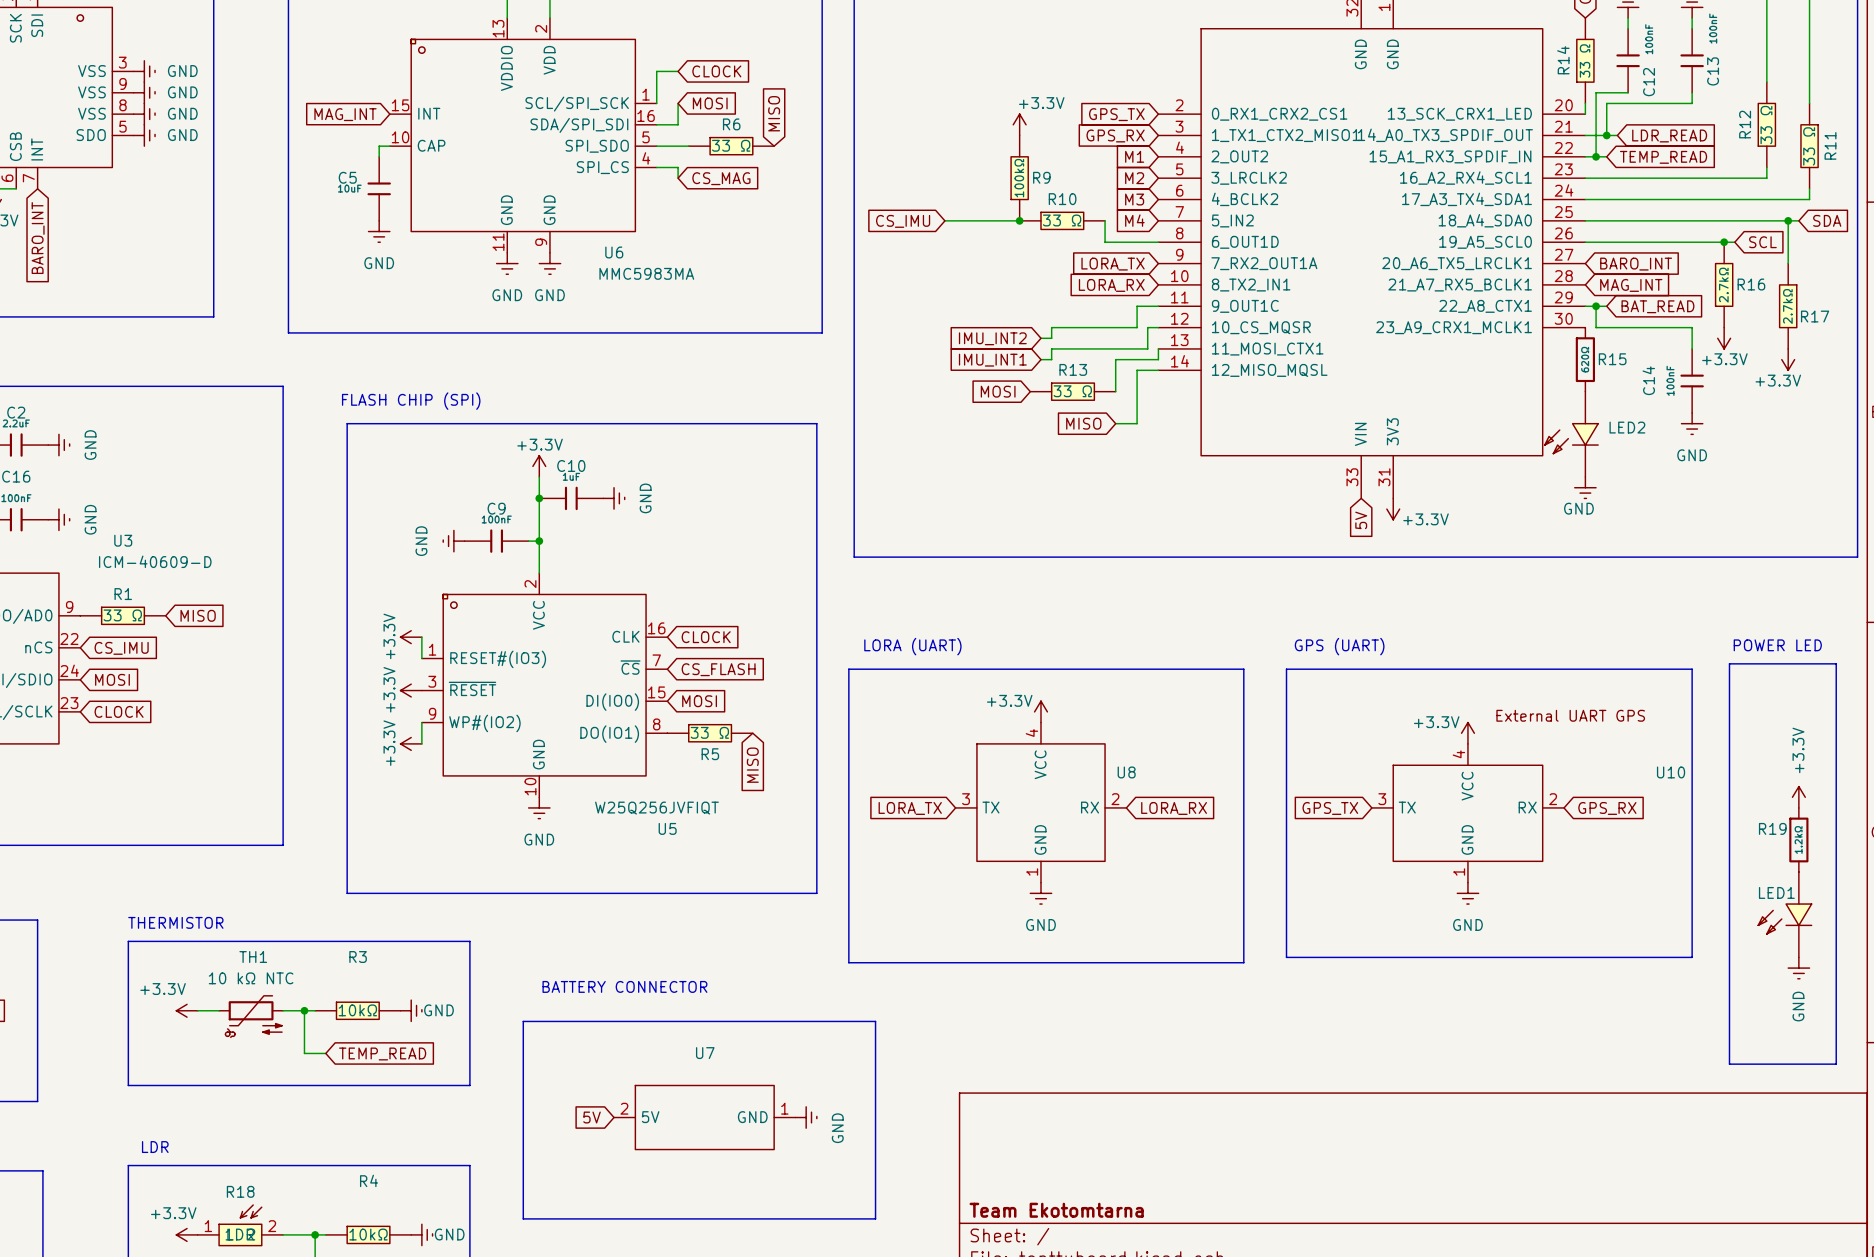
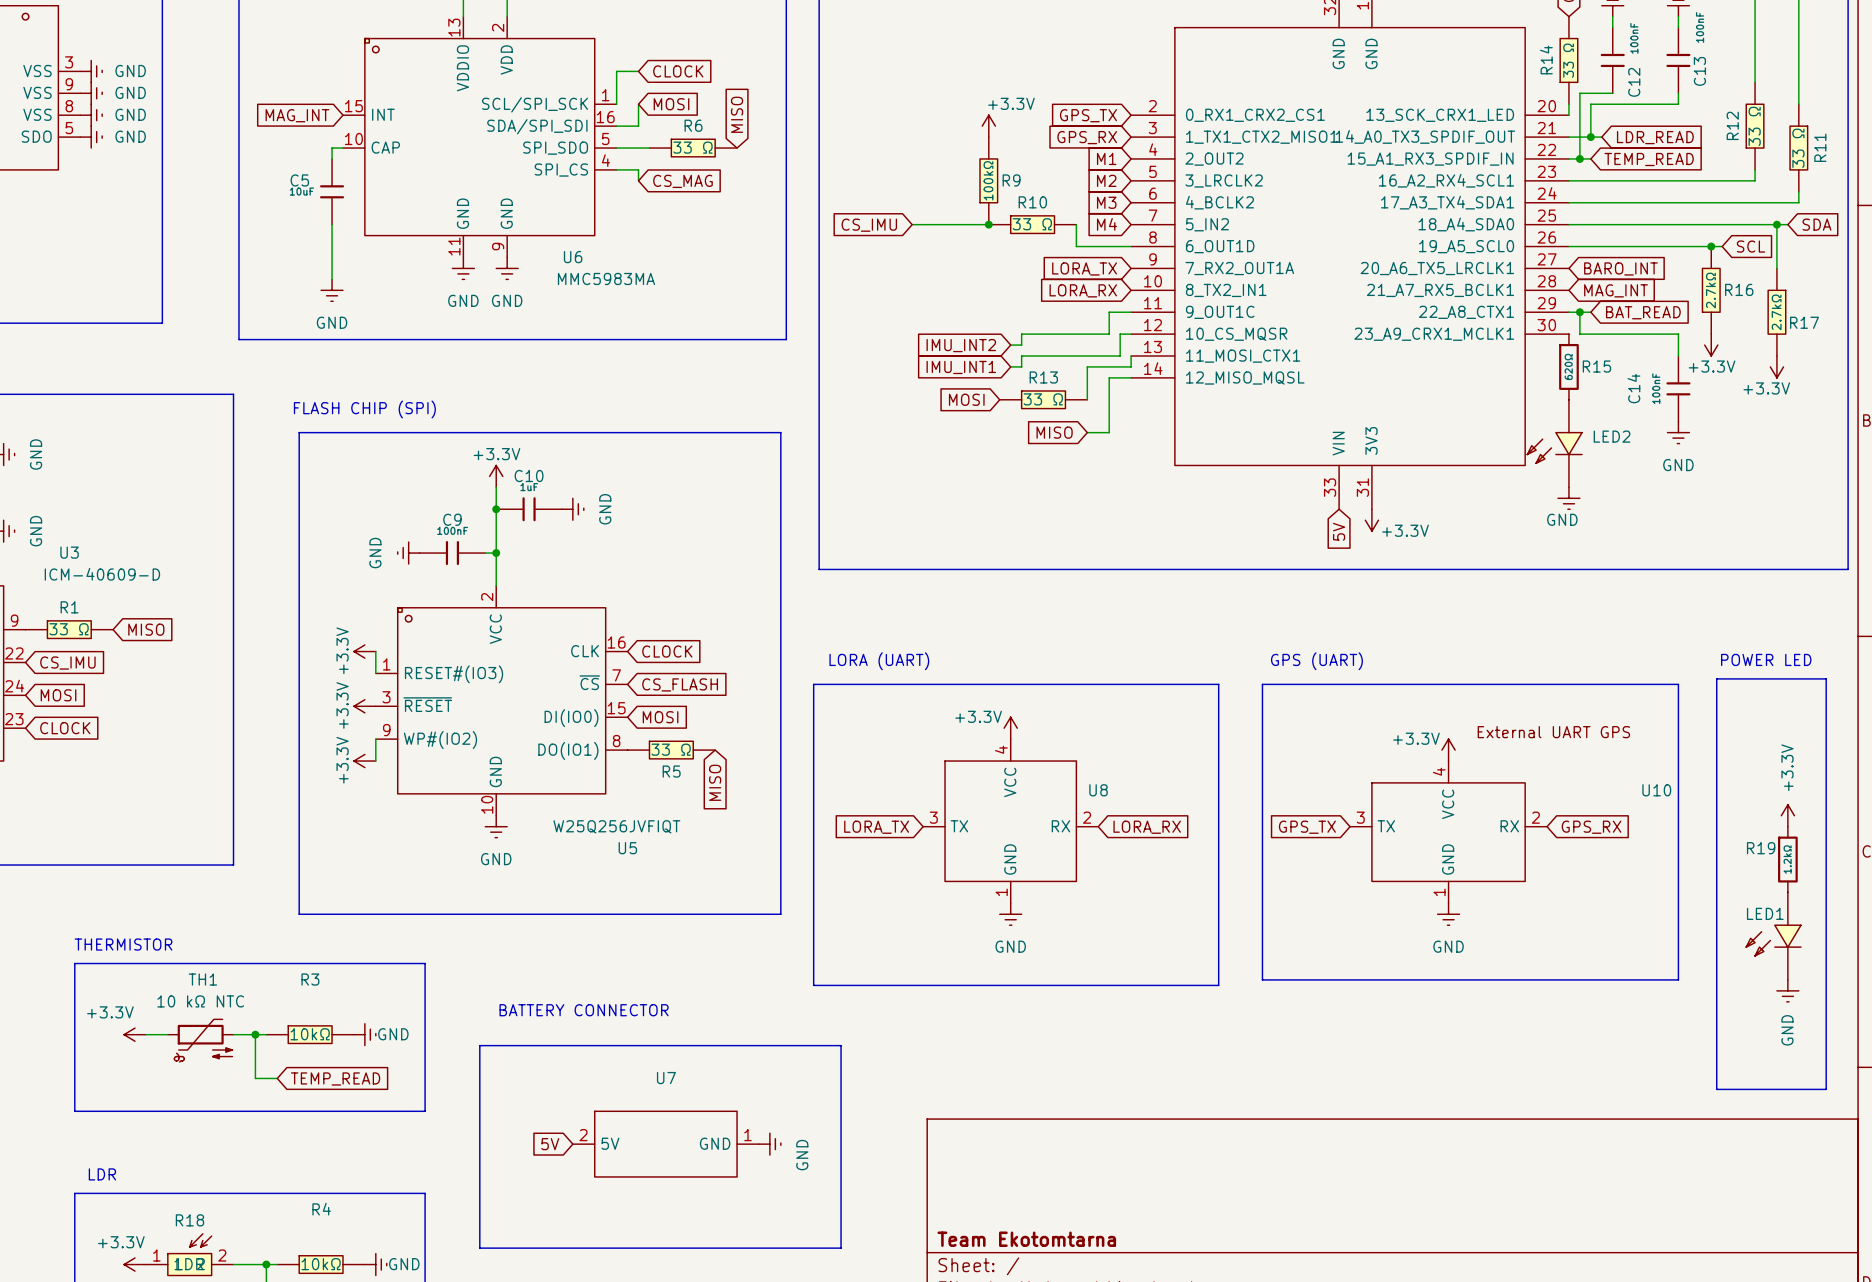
wire: none -> (332, 224) (332, 279)
power symbol position: GND (379, 231) -> GND (332, 290)

